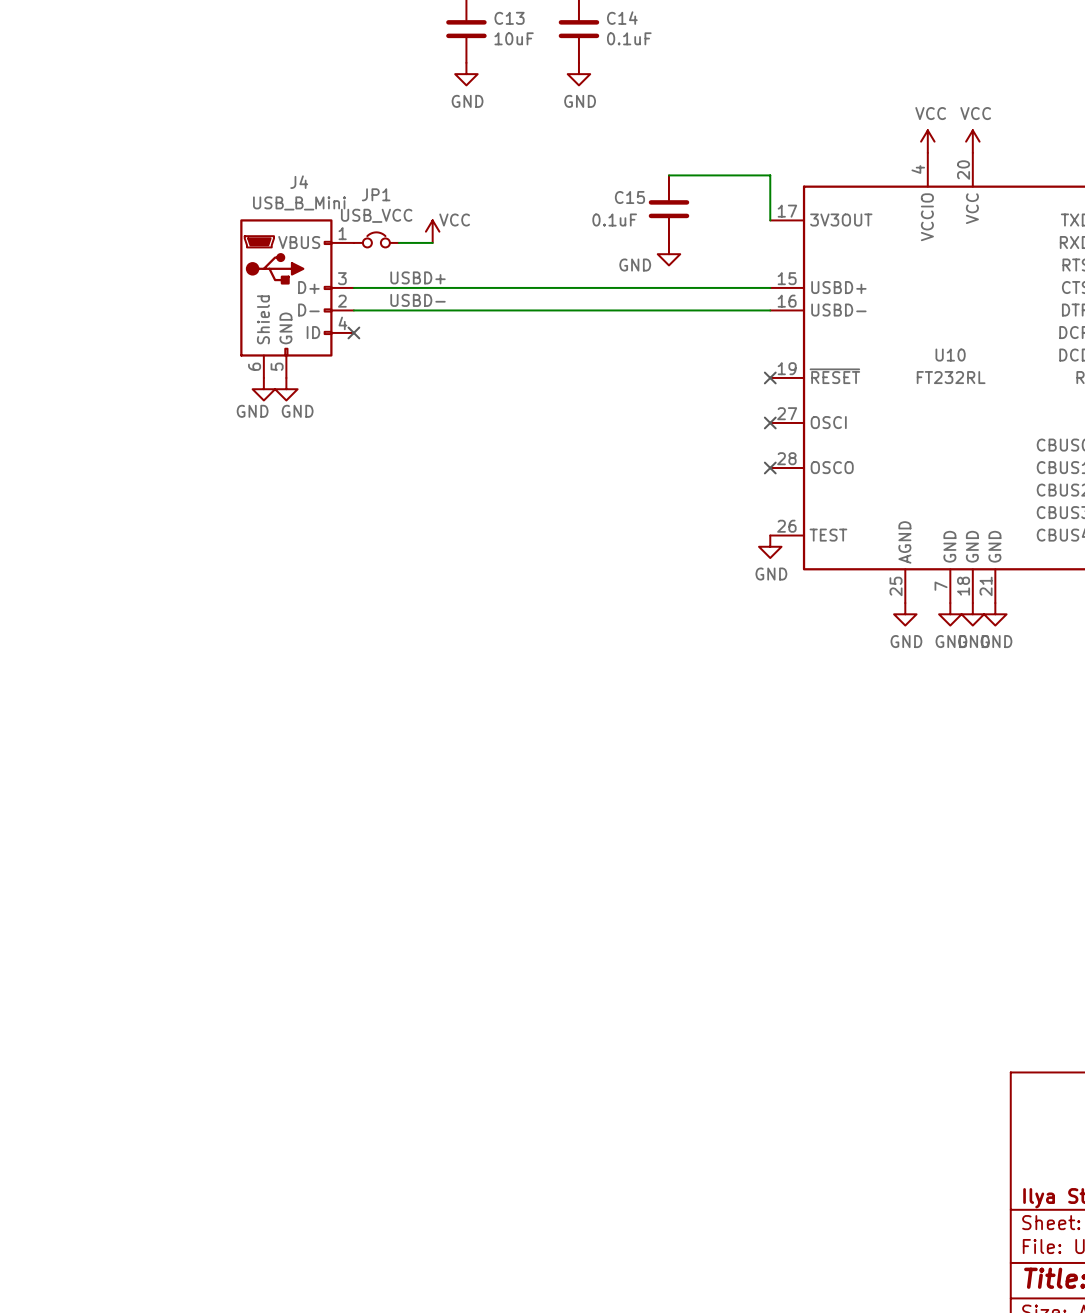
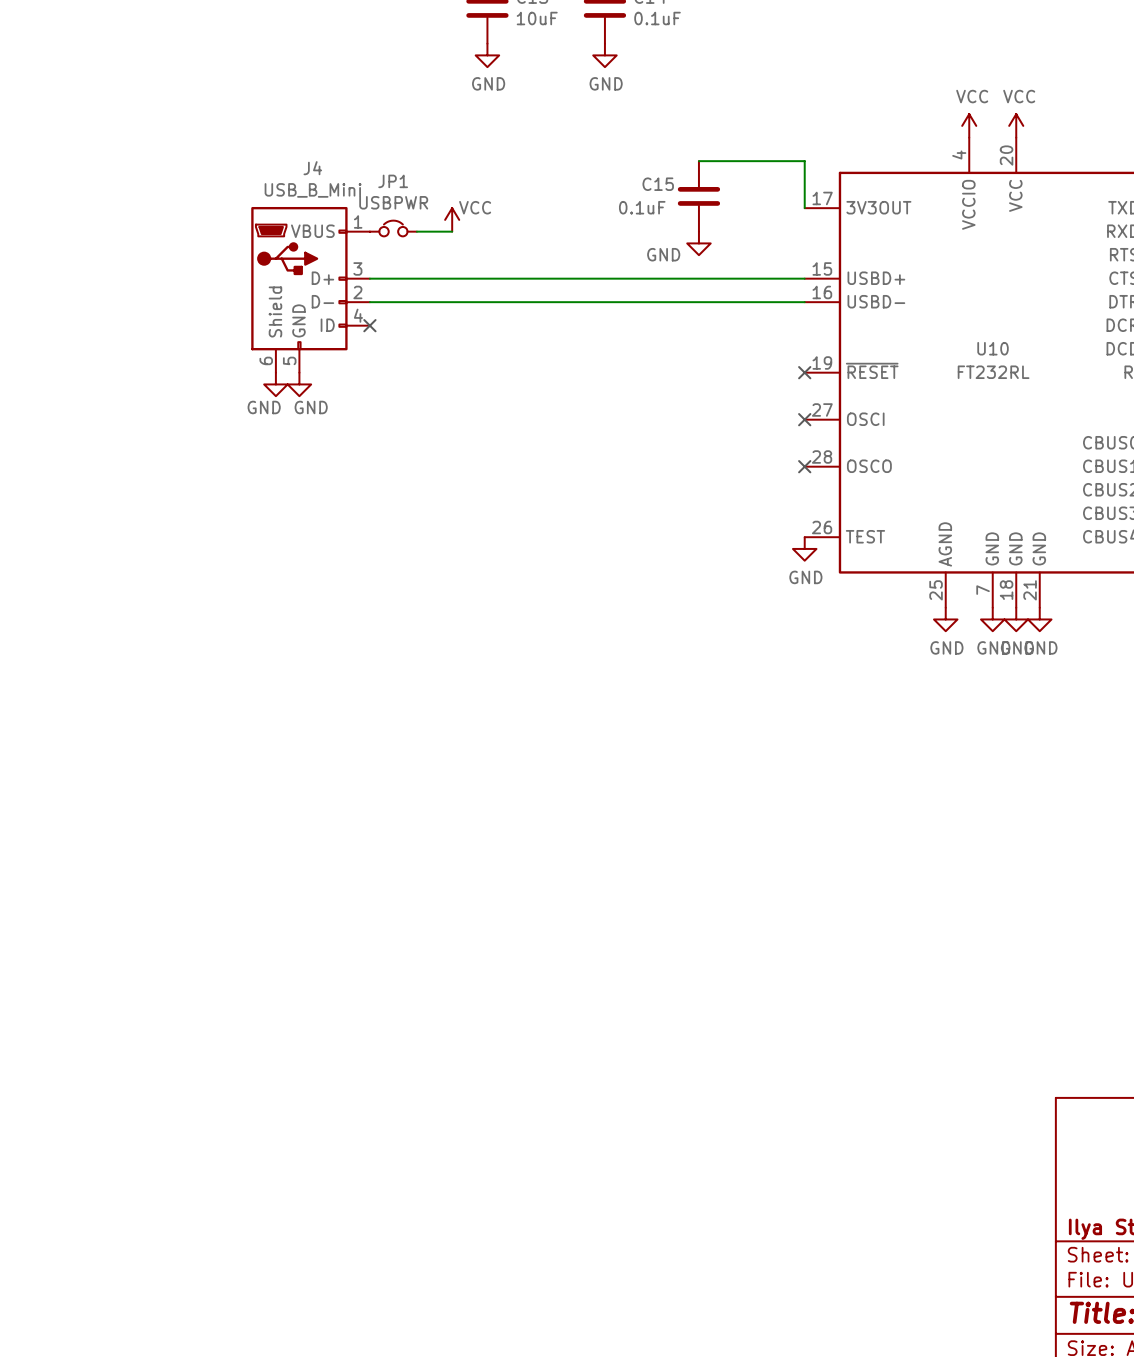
JP1 value: USB_VCC (376, 215) -> USBPWR (393, 202)
label: USBD+ (418, 277) -> none
label: USBD- (418, 300) -> none

